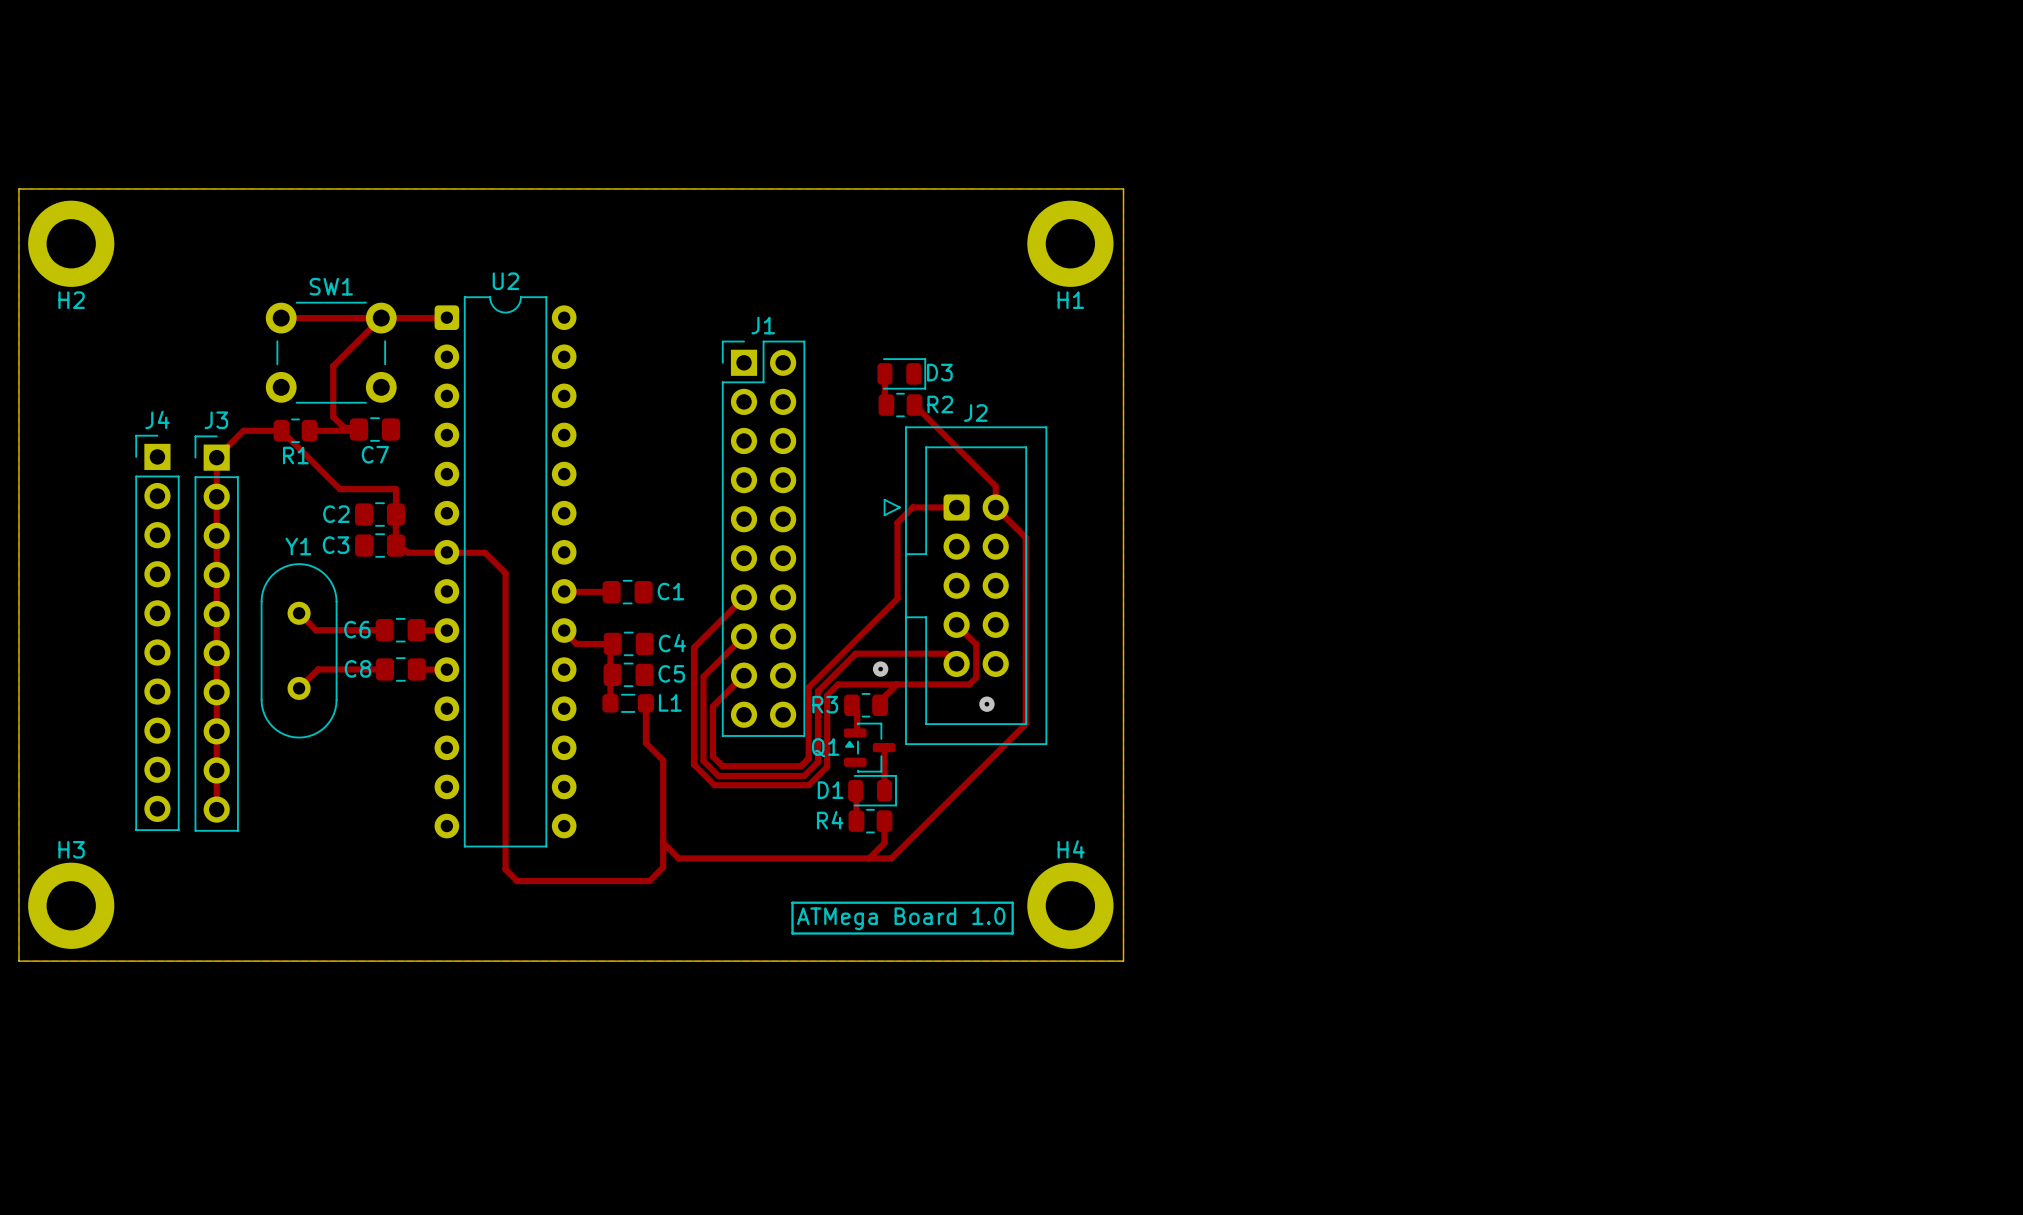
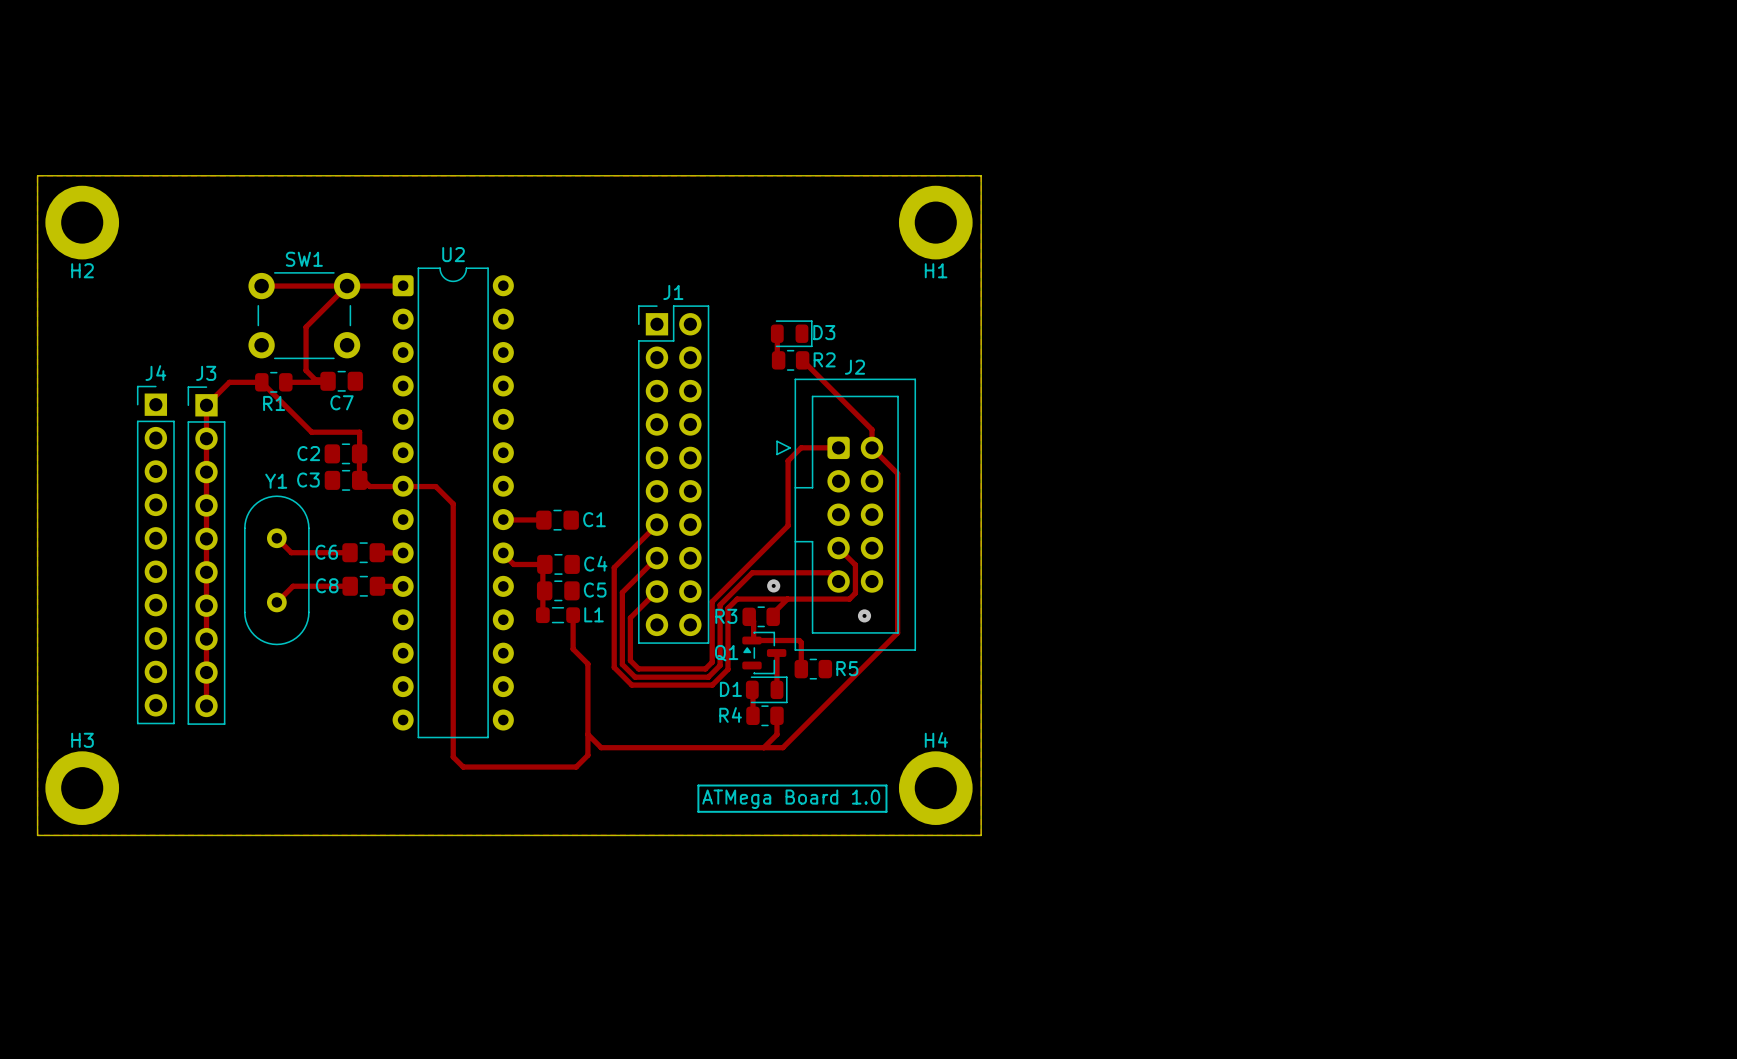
track: none -> (751, 640) (799, 640) (801, 642) (801, 669)
R5: none -> (813, 669)

